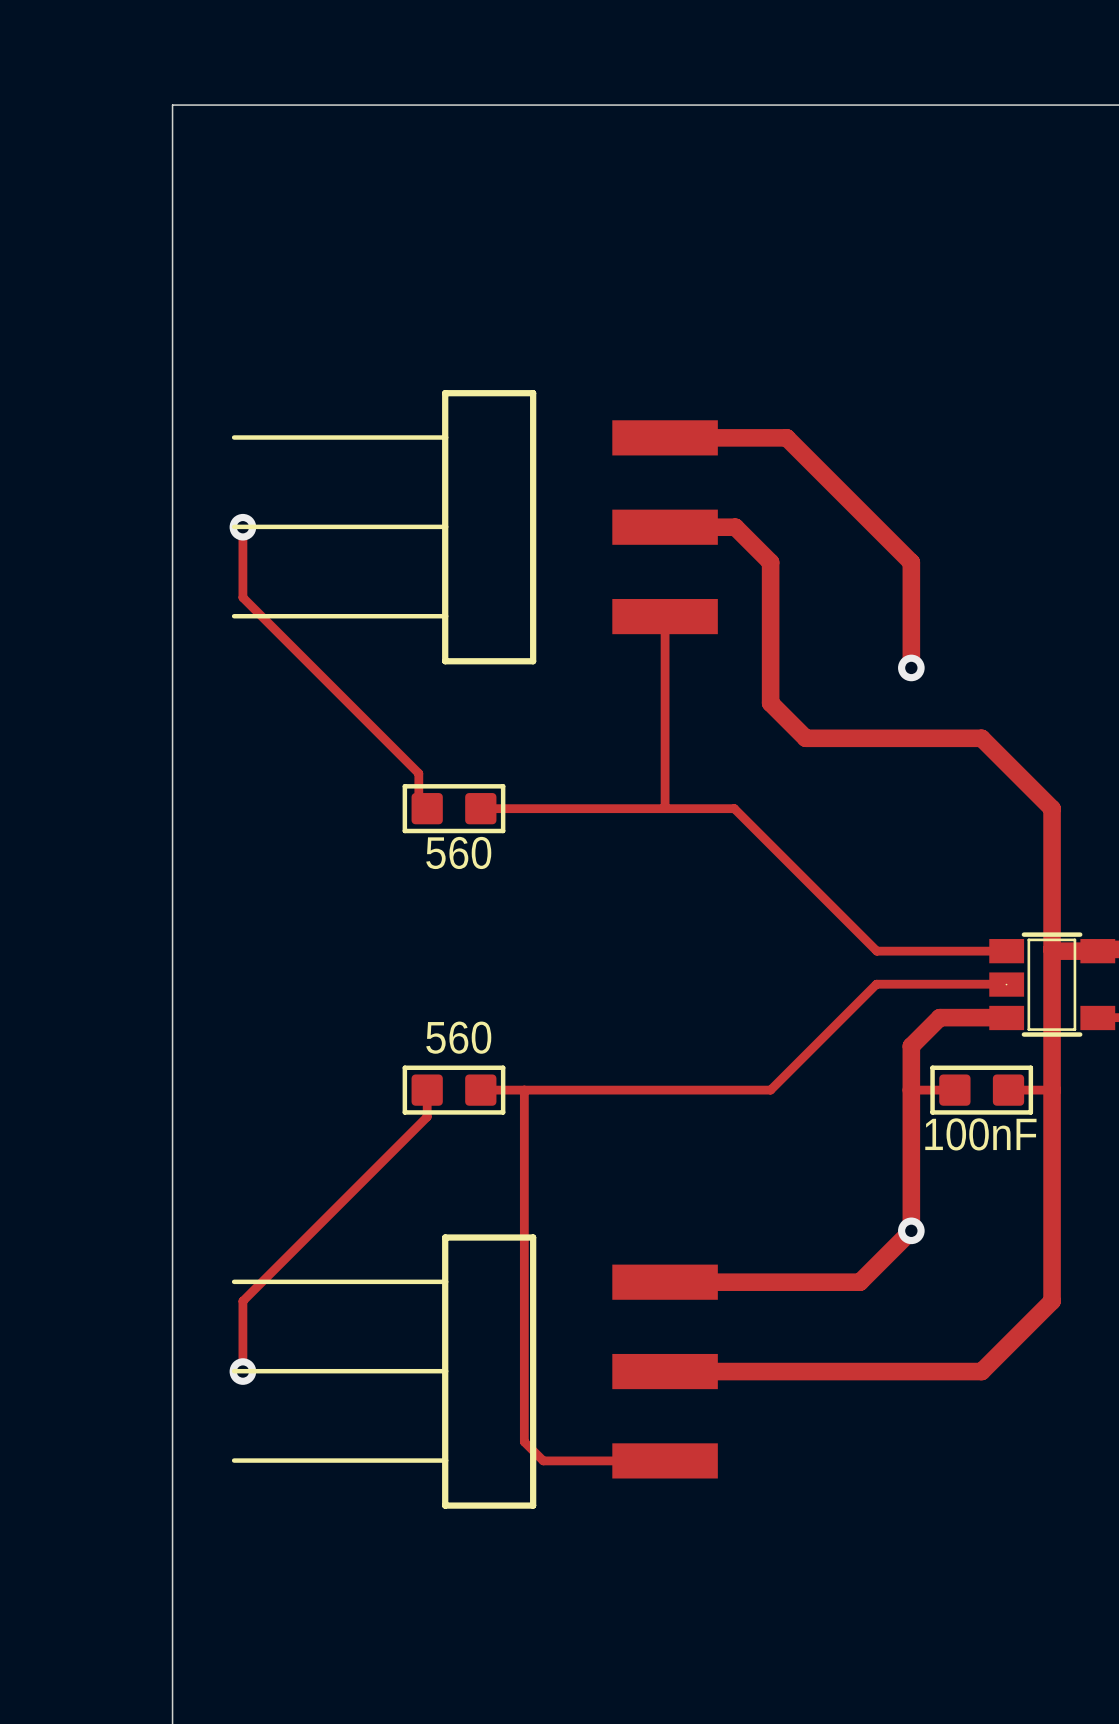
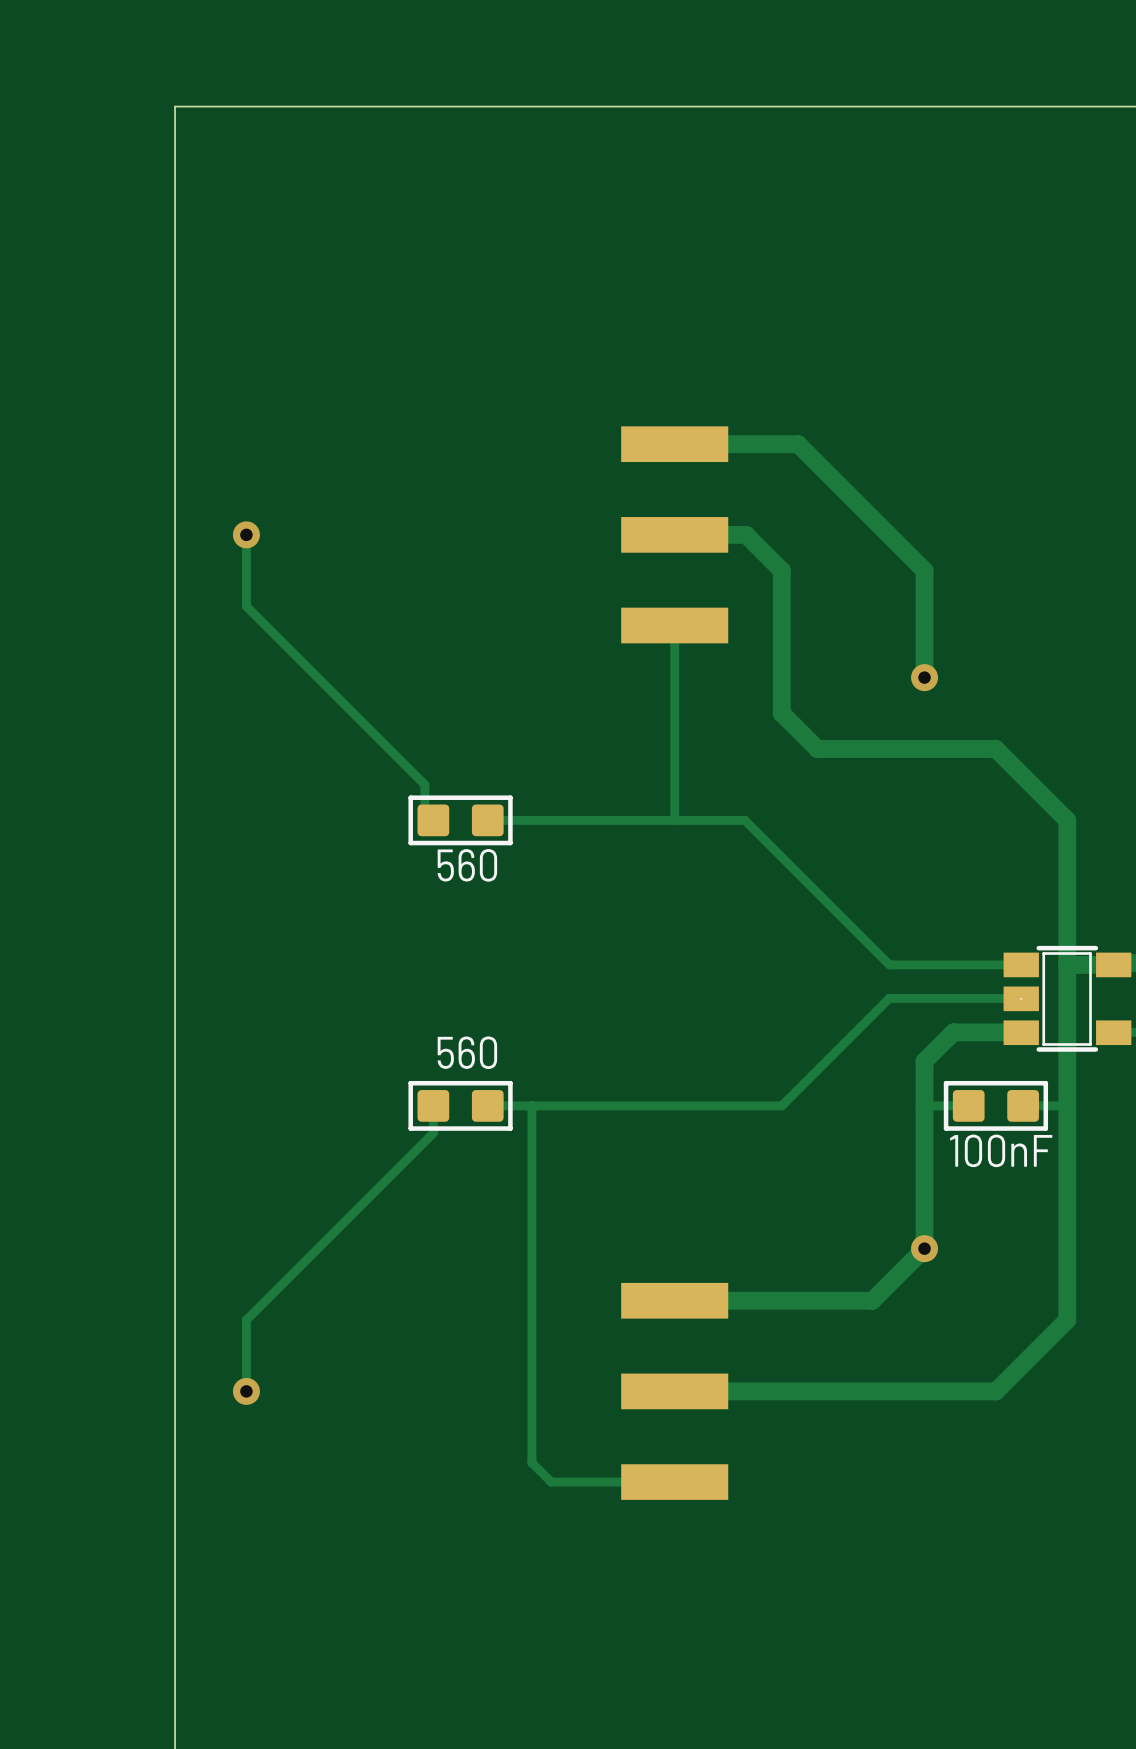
part: (474, 527) -> none
part: (474, 1371) -> none

